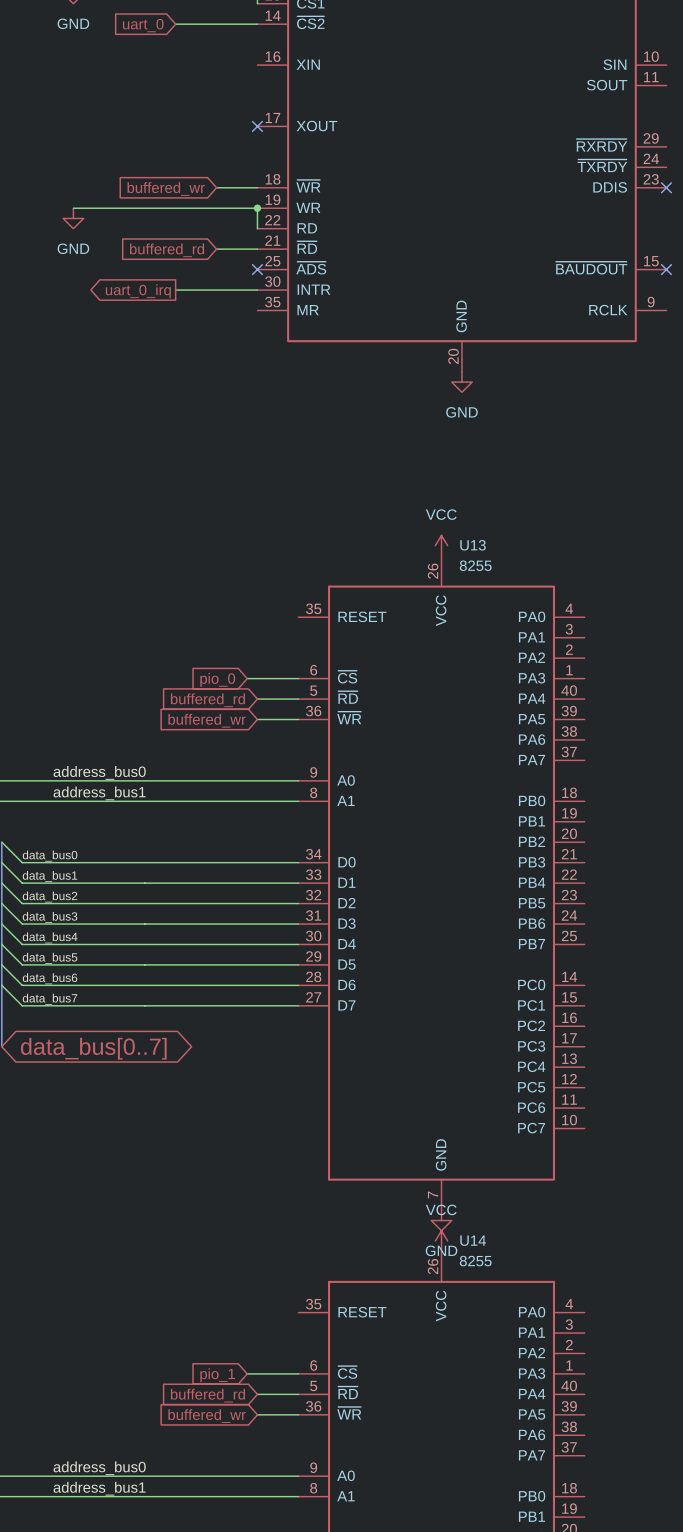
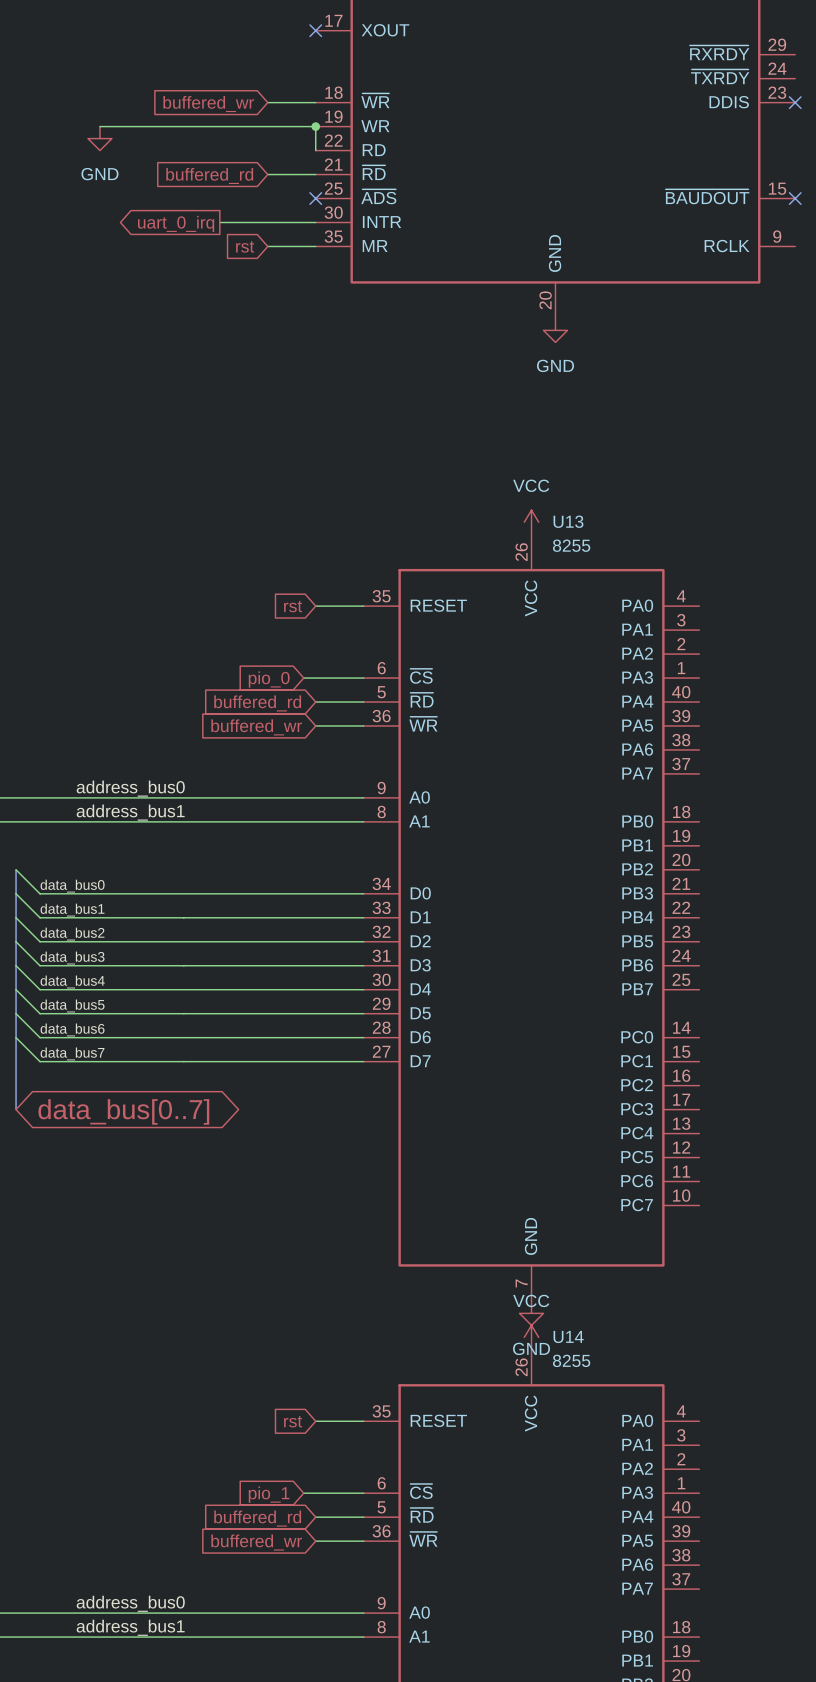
global label: none -> rst (245, 246)
wire: none -> (267, 246) (315, 246)
global label: none -> rst (293, 606)
wire: none -> (315, 606) (363, 606)
global label: none -> rst (293, 1421)
wire: none -> (315, 1421) (363, 1421)

